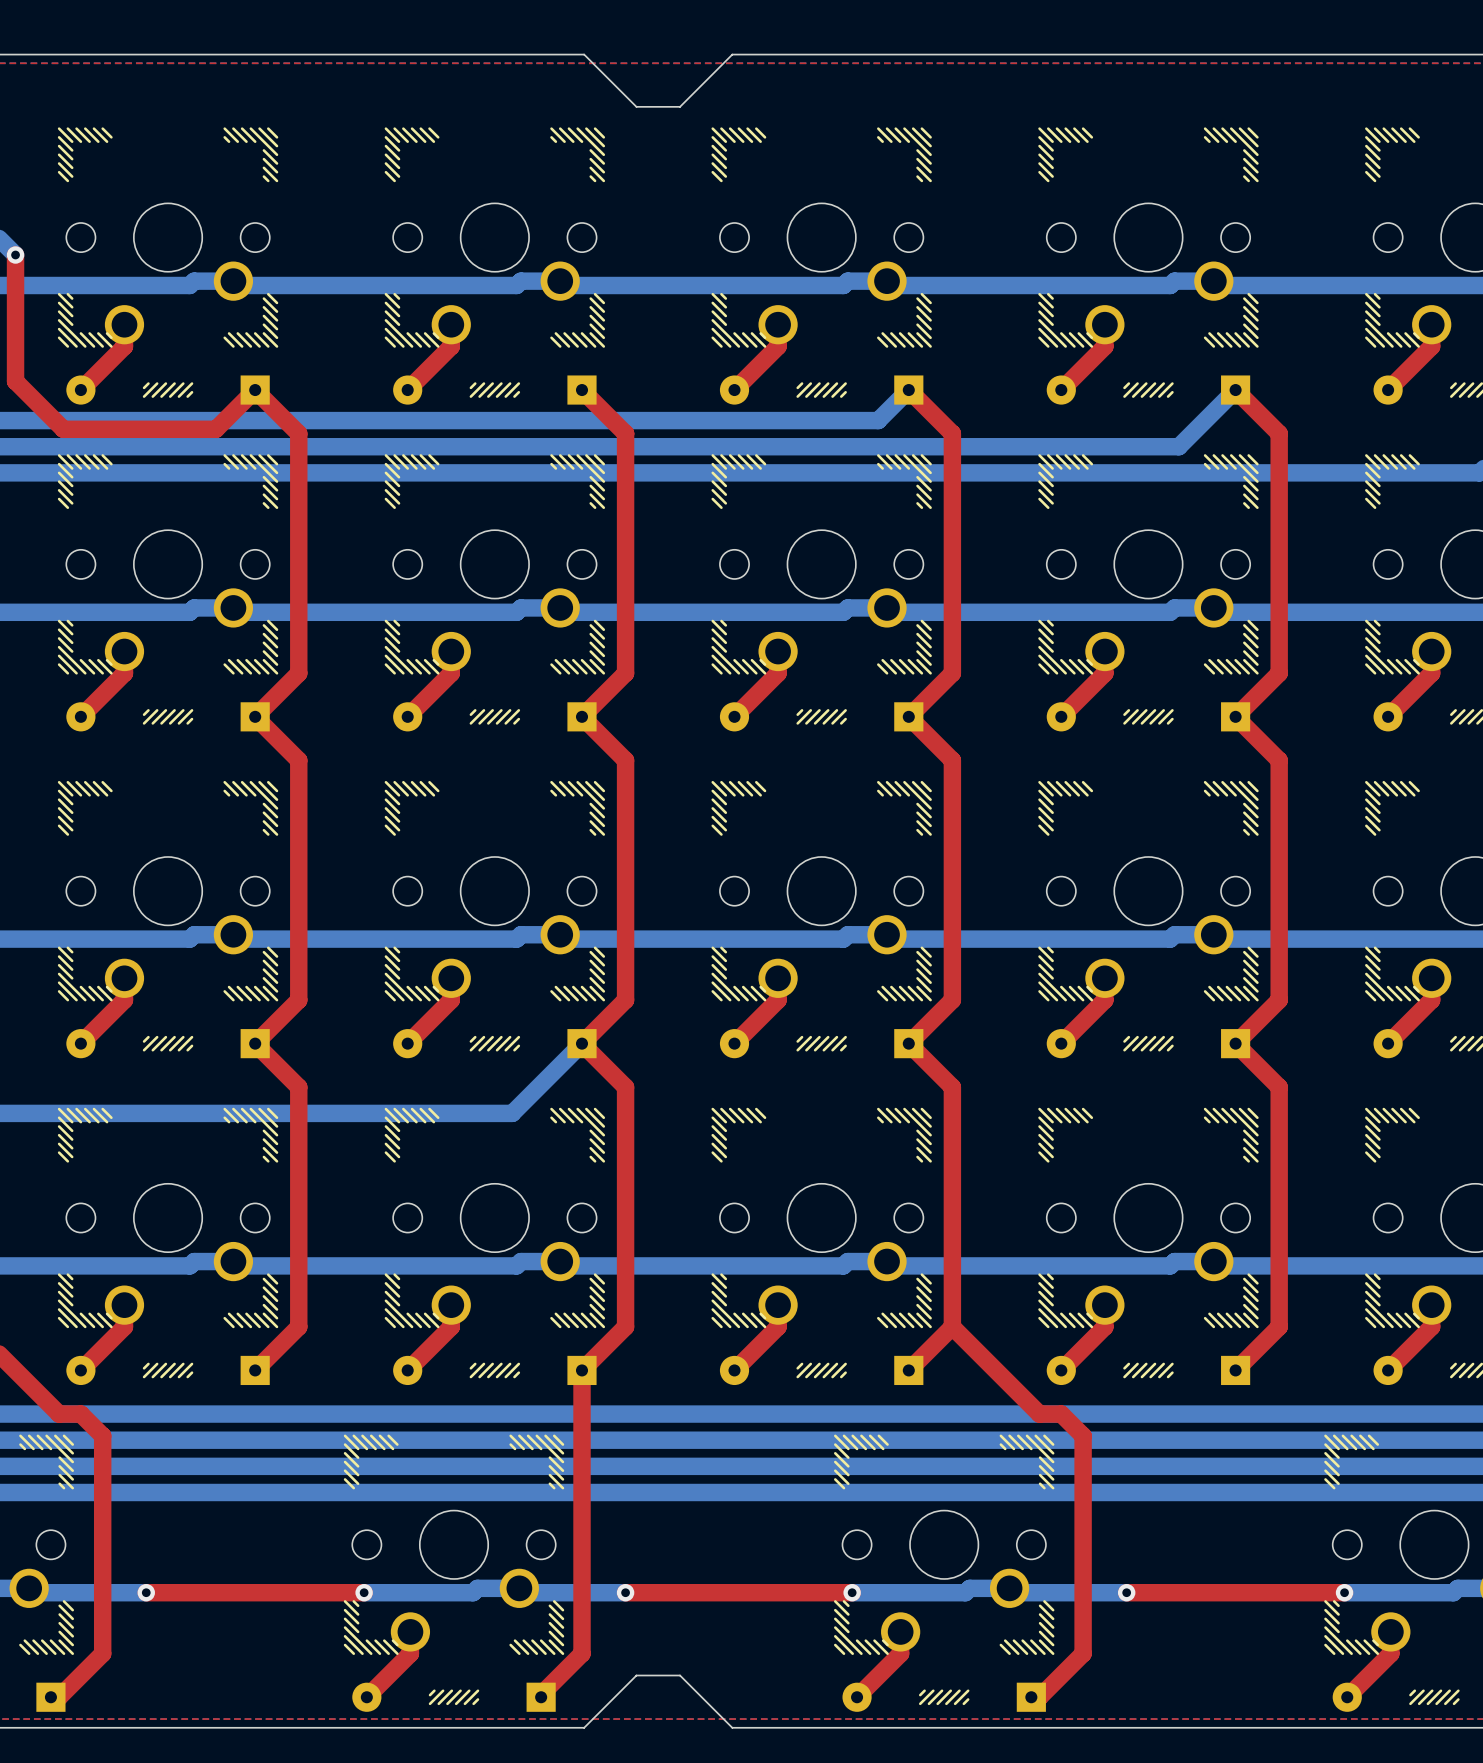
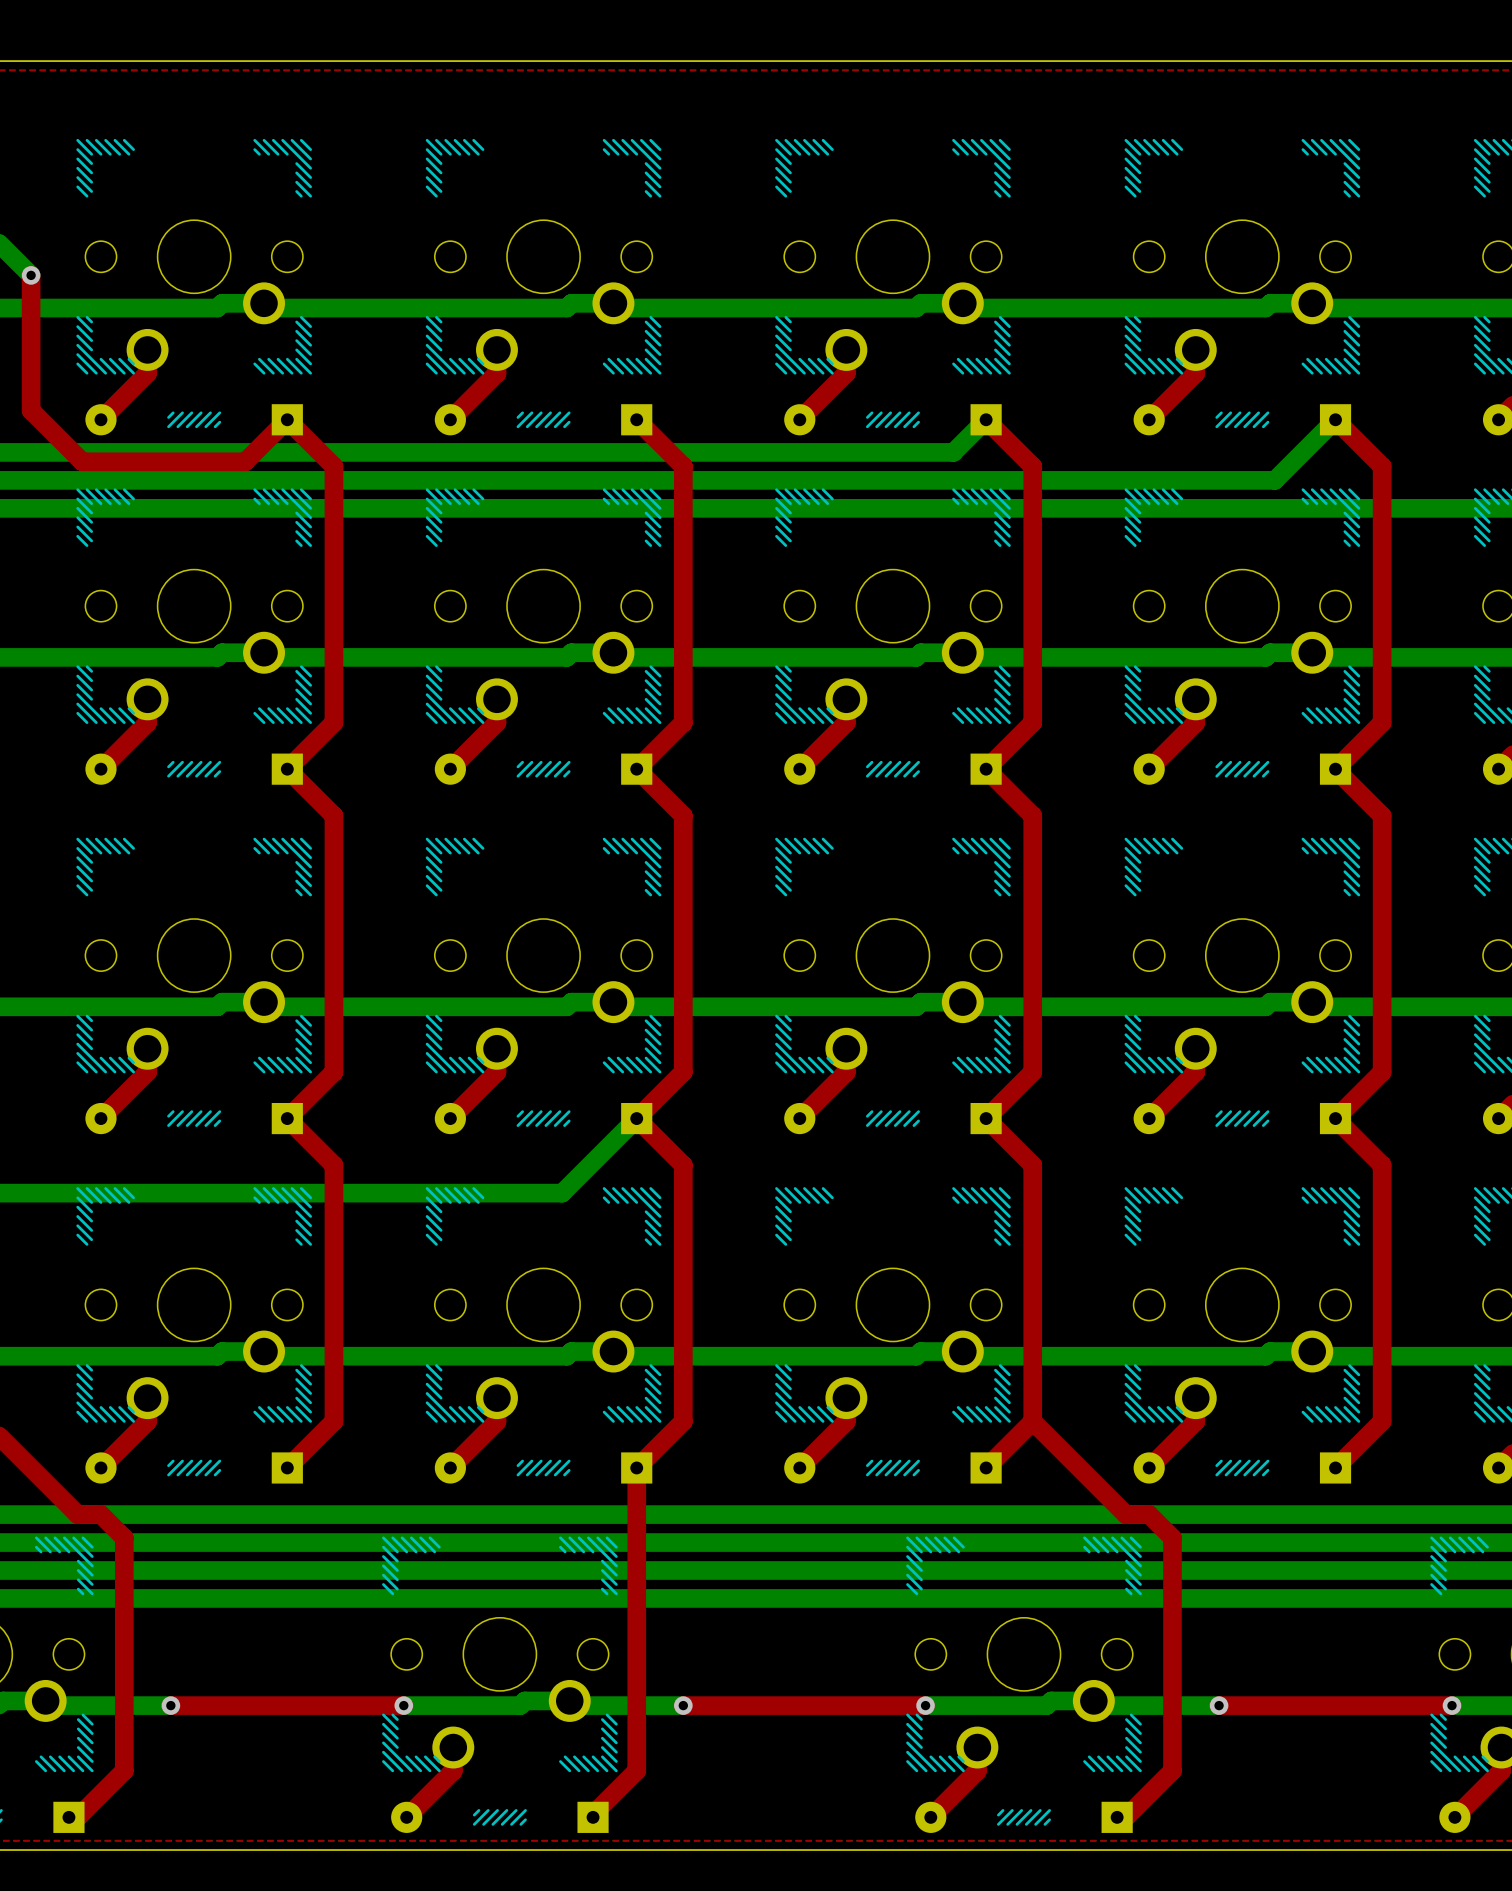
board edge: (584, 54) (636, 106) (680, 106) (732, 54) -> (639, 61) (797, 61)
board edge: (584, 1727) (636, 1675) (680, 1675) (732, 1727) -> (639, 1850) (797, 1850)

